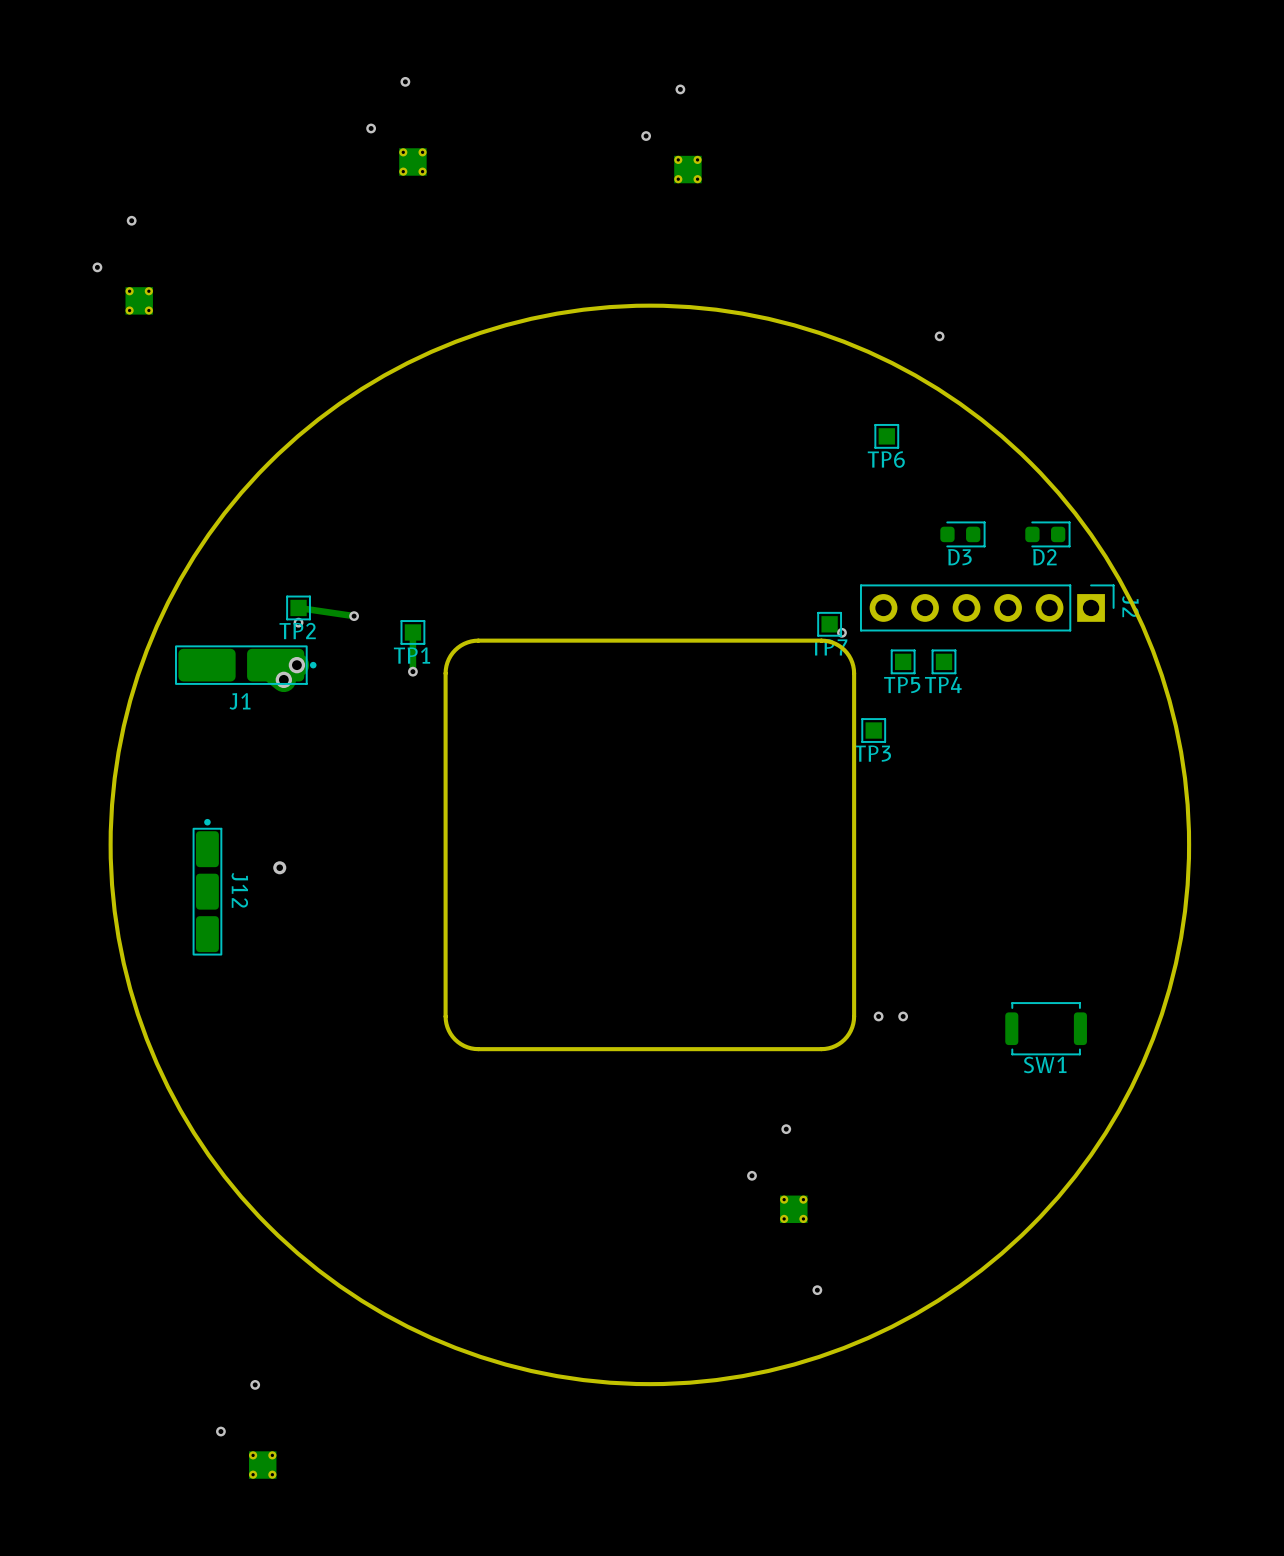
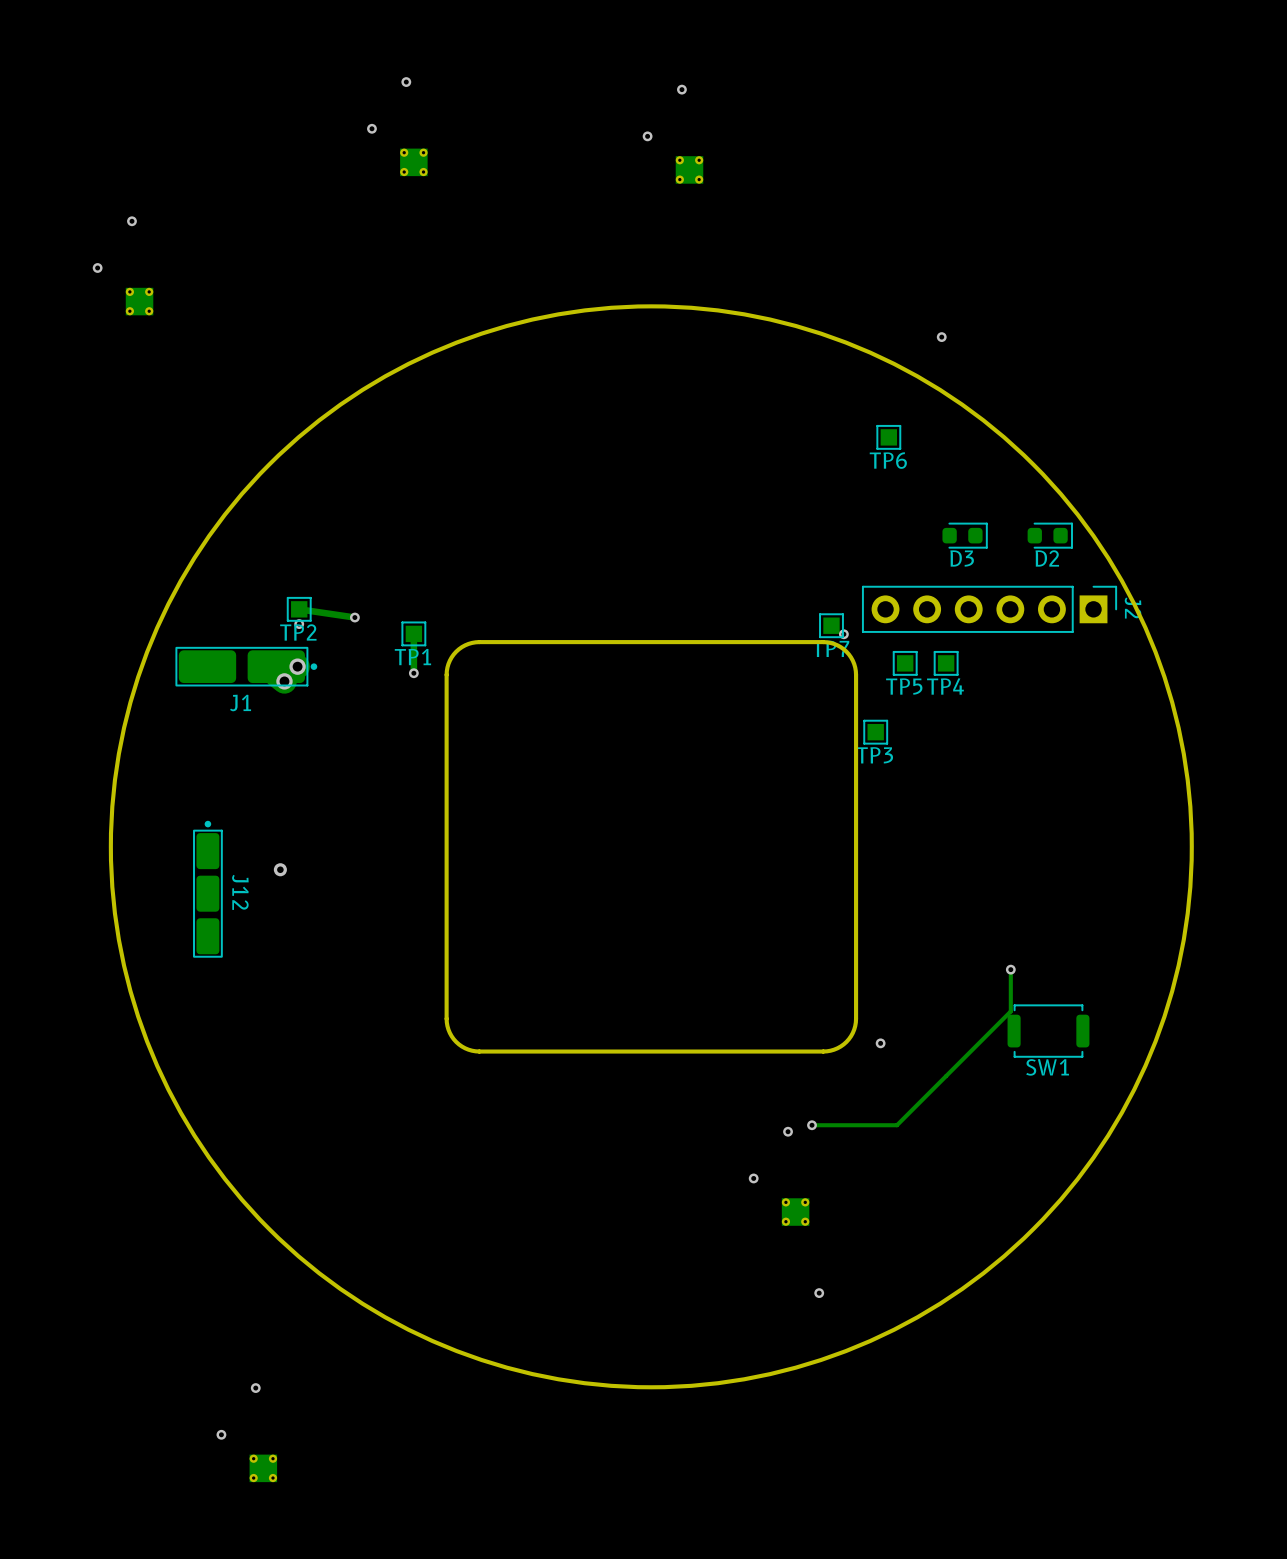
track: none -> (1010, 969) (1010, 1011) (897, 1125) (812, 1125)
via: none -> (1010, 969)
via: (878, 1016) -> none
via: (903, 1016) -> none
via: none -> (880, 1043)
via: none -> (812, 1125)

